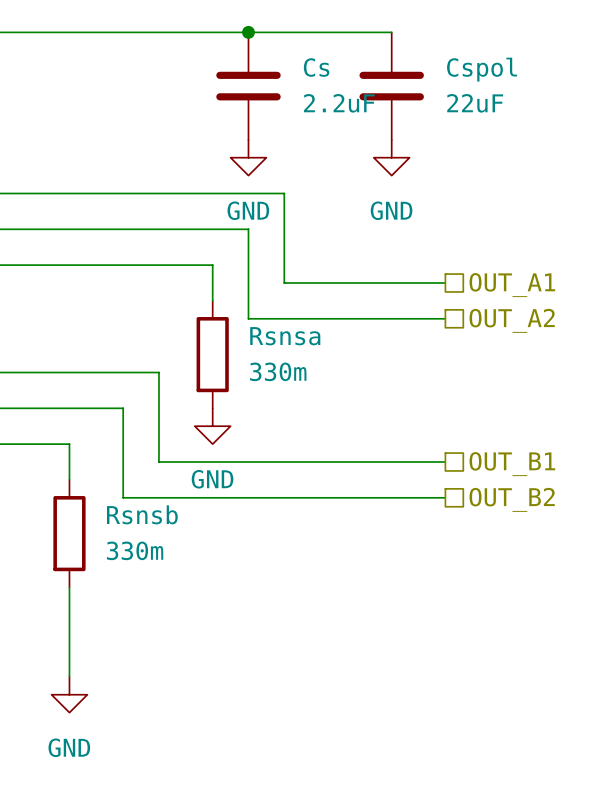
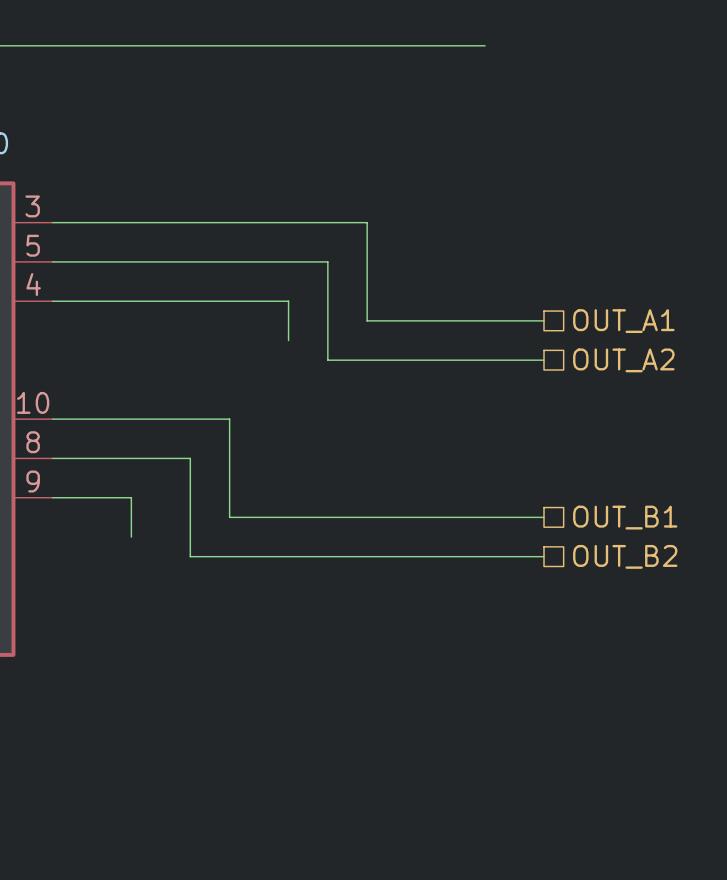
junction: (248, 32) -> none
Cs: 2.2uF (248, 86) -> none
Cspol: 22uF (391, 86) -> none
power symbol: GND (248, 157) -> none
power symbol: GND (391, 157) -> none
Rsnsa: 330m (212, 354) -> none
power symbol: GND (212, 426) -> none
Rsnsb: 330m (69, 533) -> none
wire: (69, 587) (69, 676) -> none
power symbol: GND (69, 694) -> none

